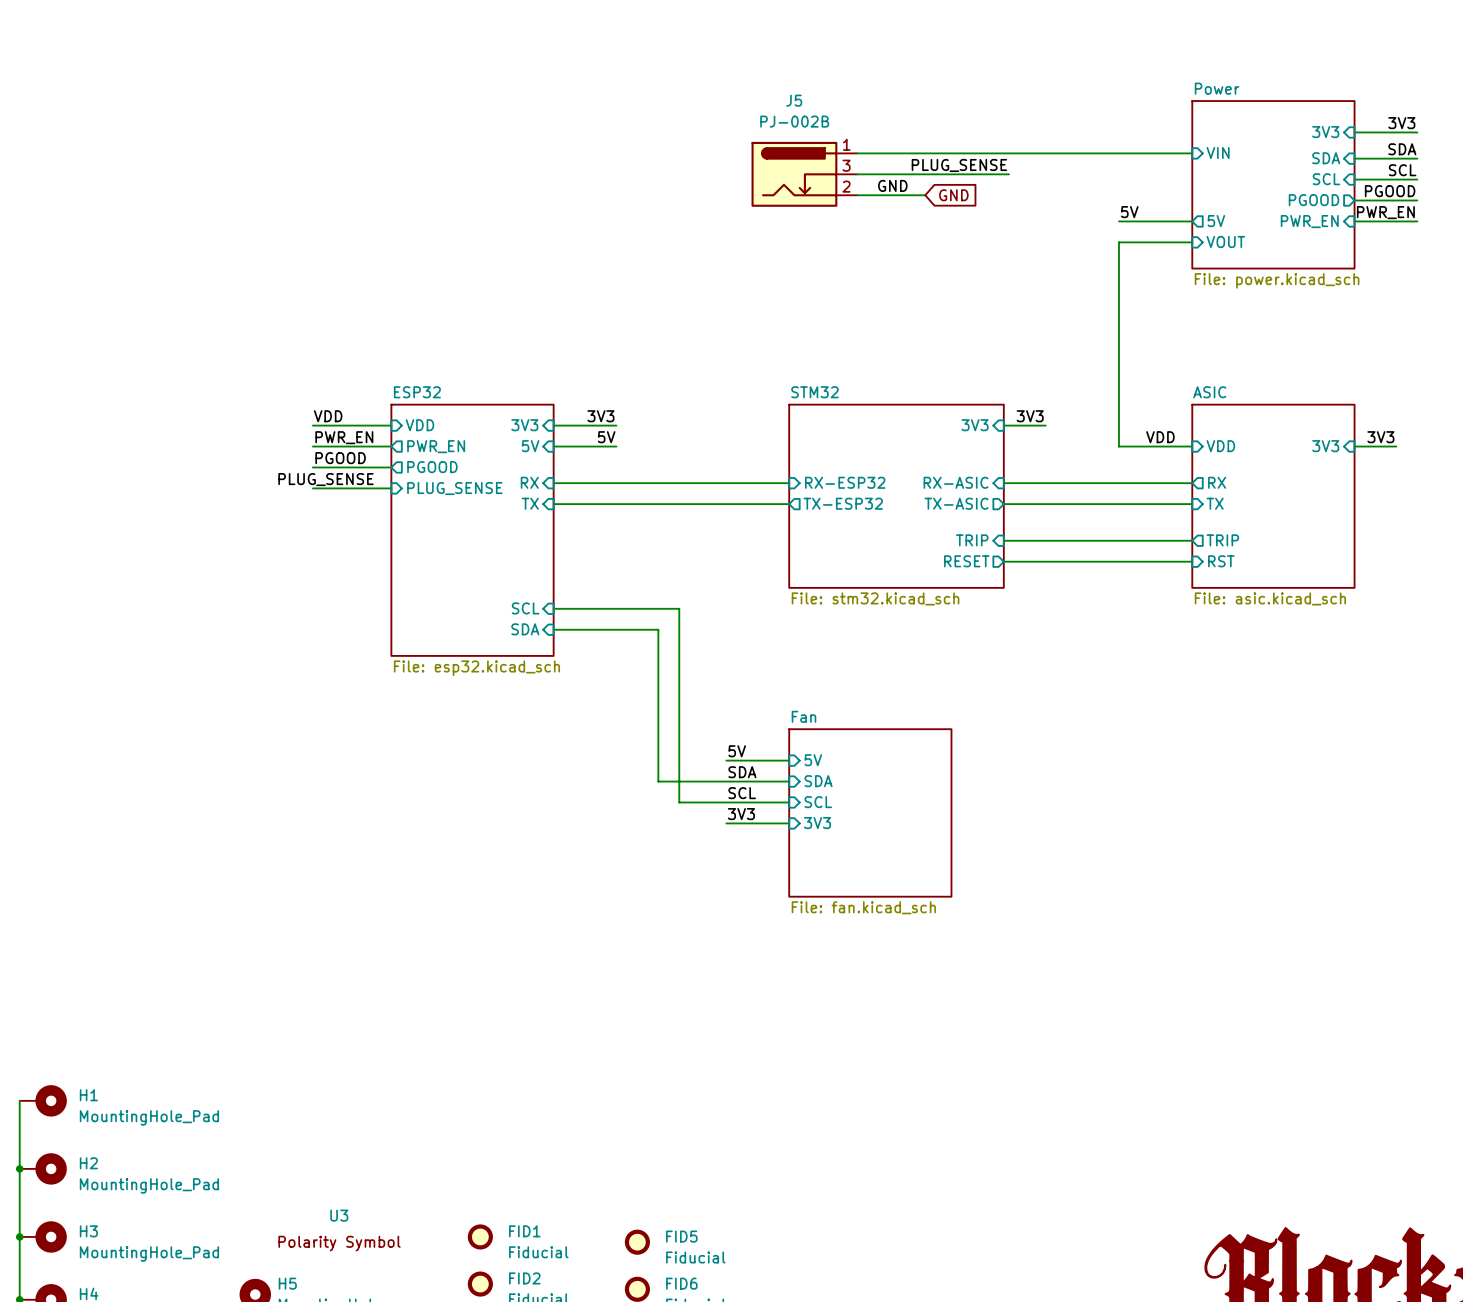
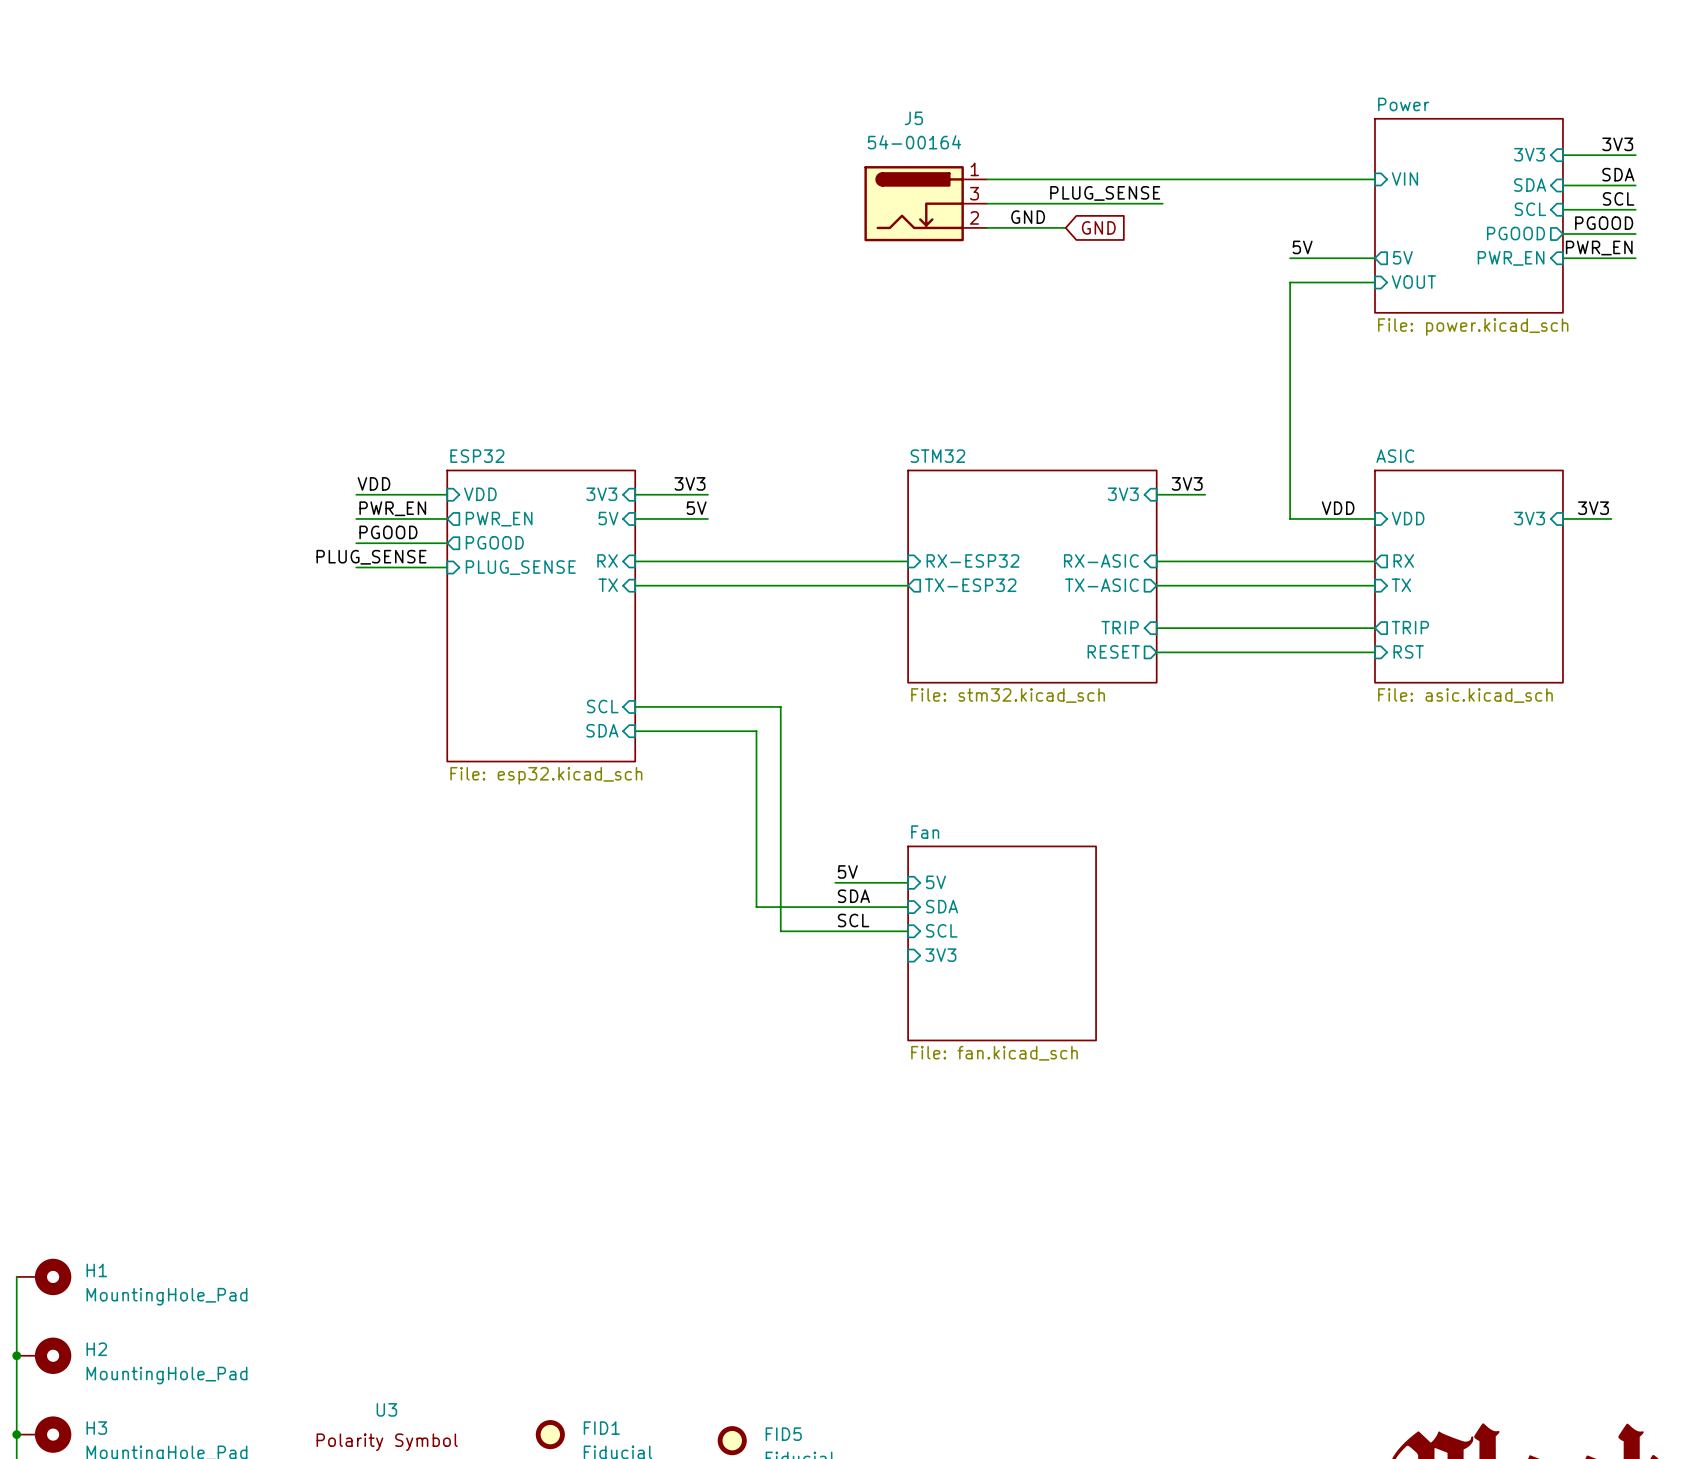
J5 value: PJ-002B (794, 121) -> 54-00164 (914, 142)
label: 3V3 (741, 814) -> none
wire: (726, 823) (789, 823) -> none

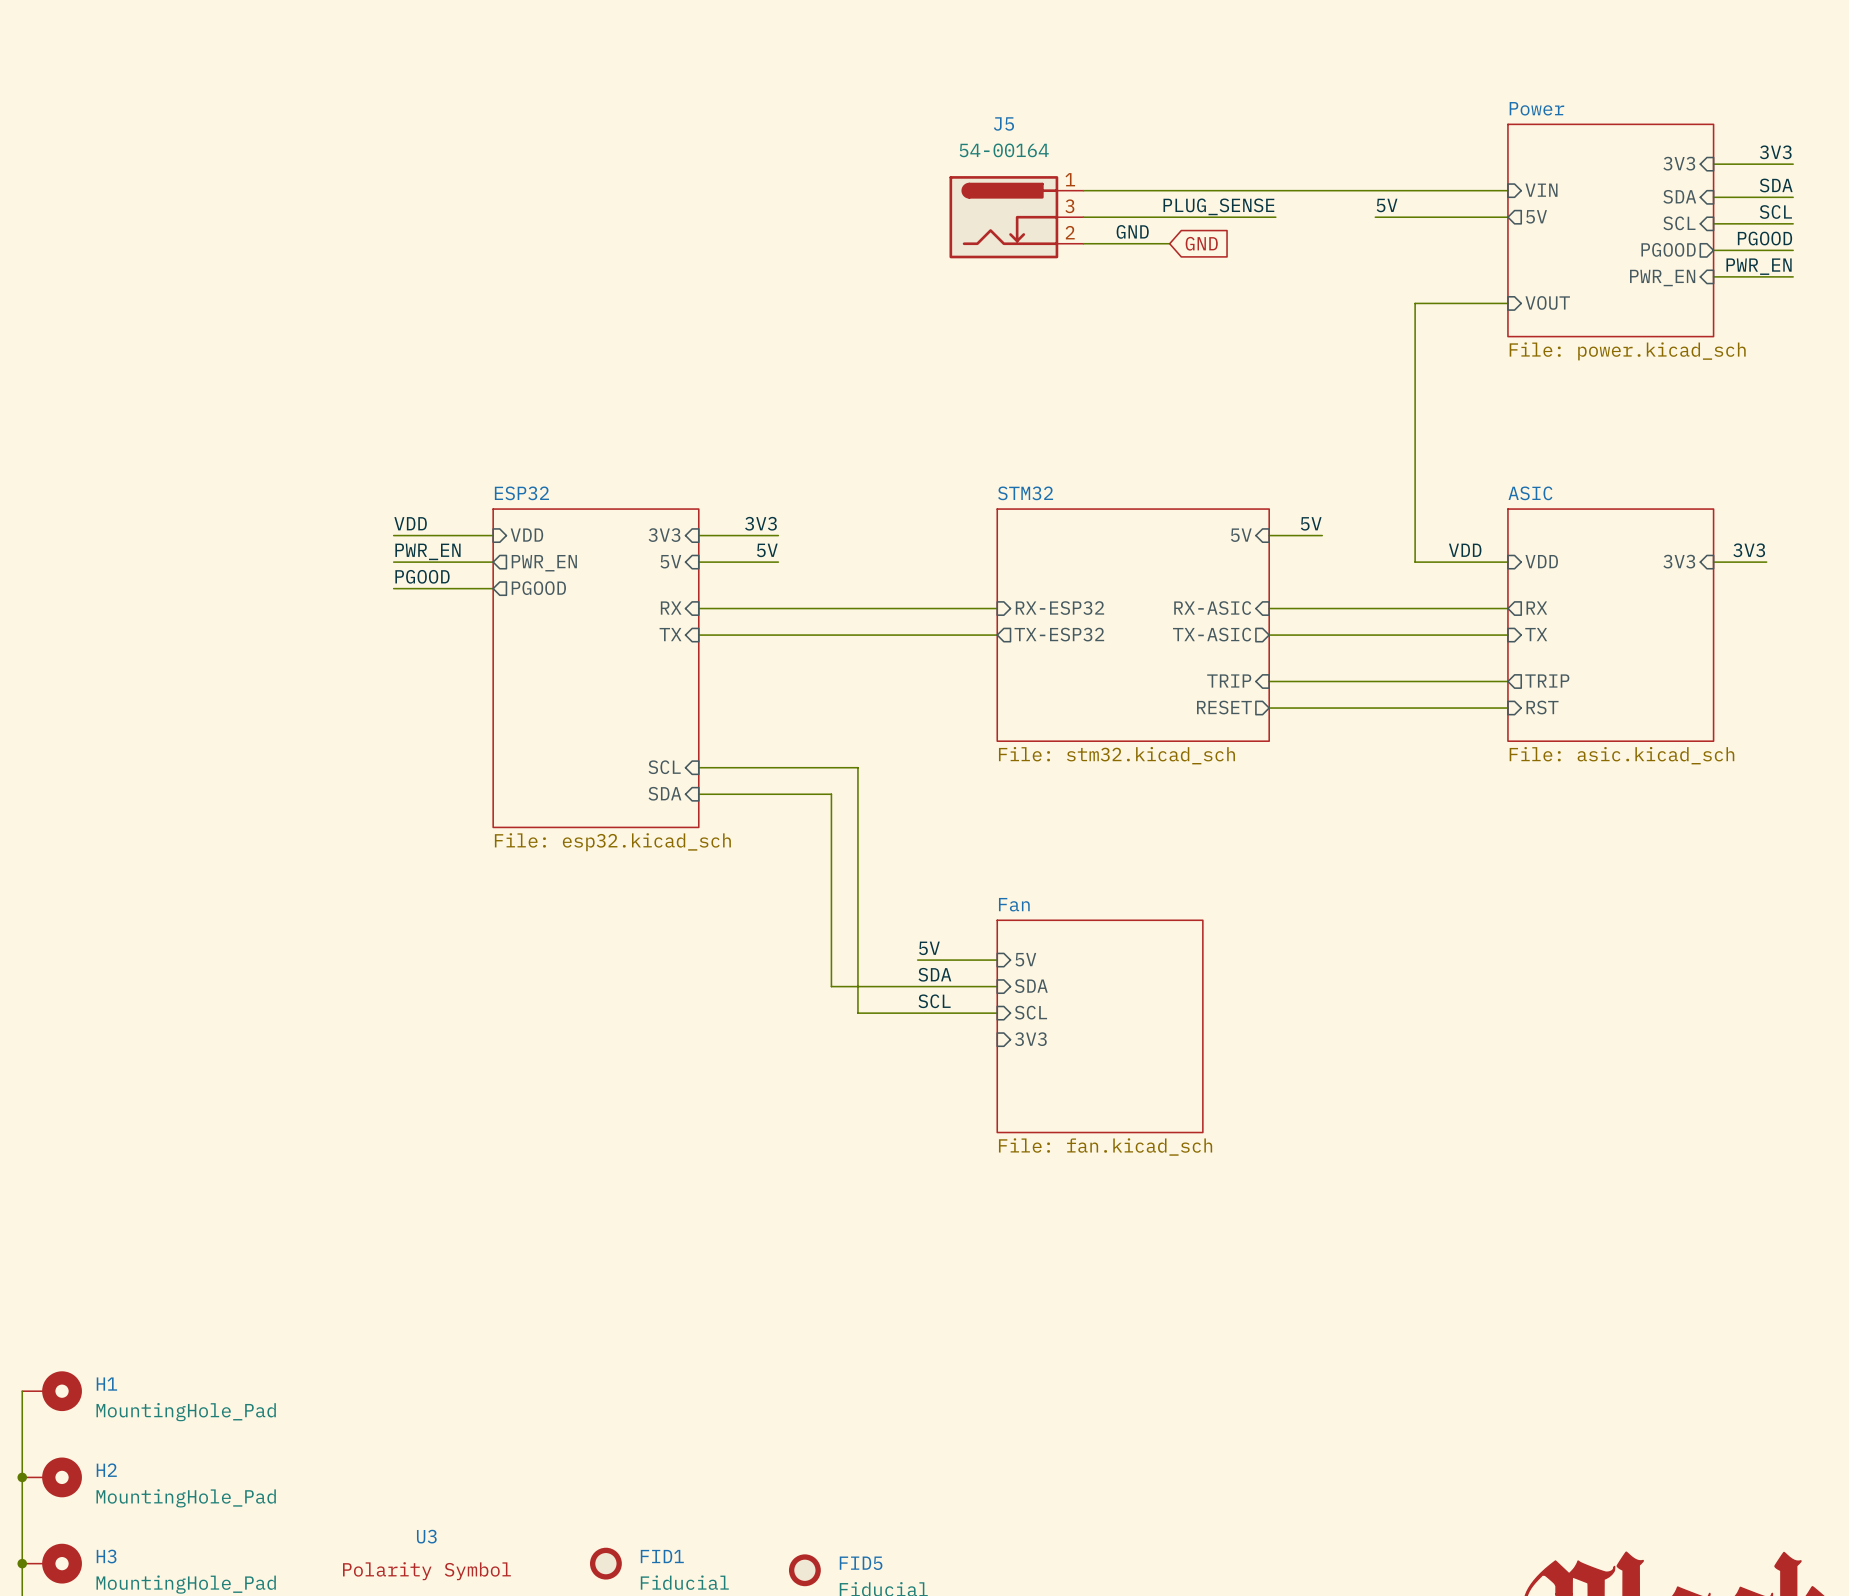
wire: none -> (1375, 217) (1507, 217)
label position: 5V (1302, 247) -> 5V (1387, 205)
sheet pin position: 5V (1402, 257) -> 5V (1536, 216)
wire: (1290, 258) (1374, 258) -> none
label: 3V3 (1187, 483) -> 5V (1311, 523)
sheet pin: 3V3 (1123, 494) -> 5V (1241, 535)
label: PLUG_SENSE (371, 557) -> none
wire: (356, 567) (447, 567) -> none
sheet pin: PLUG_SENSE (520, 567) -> none

